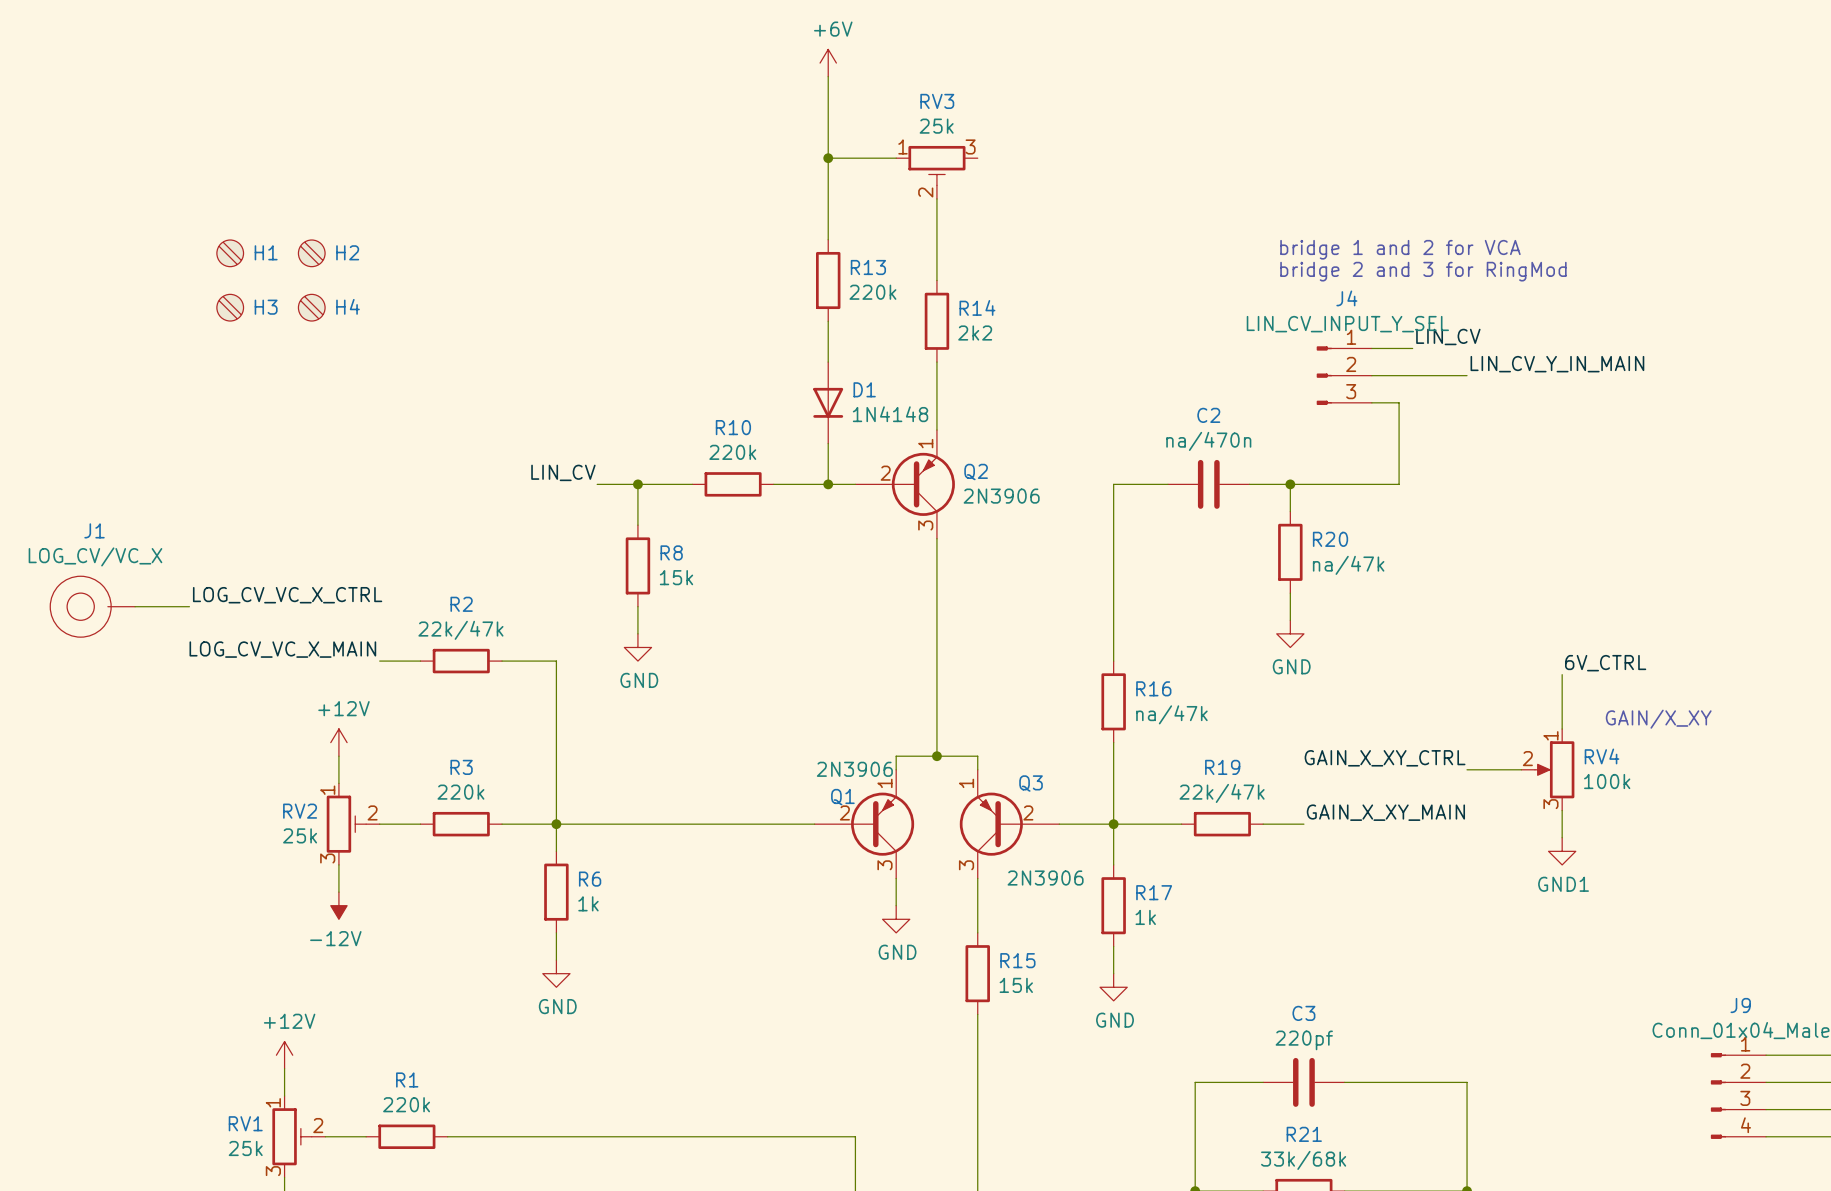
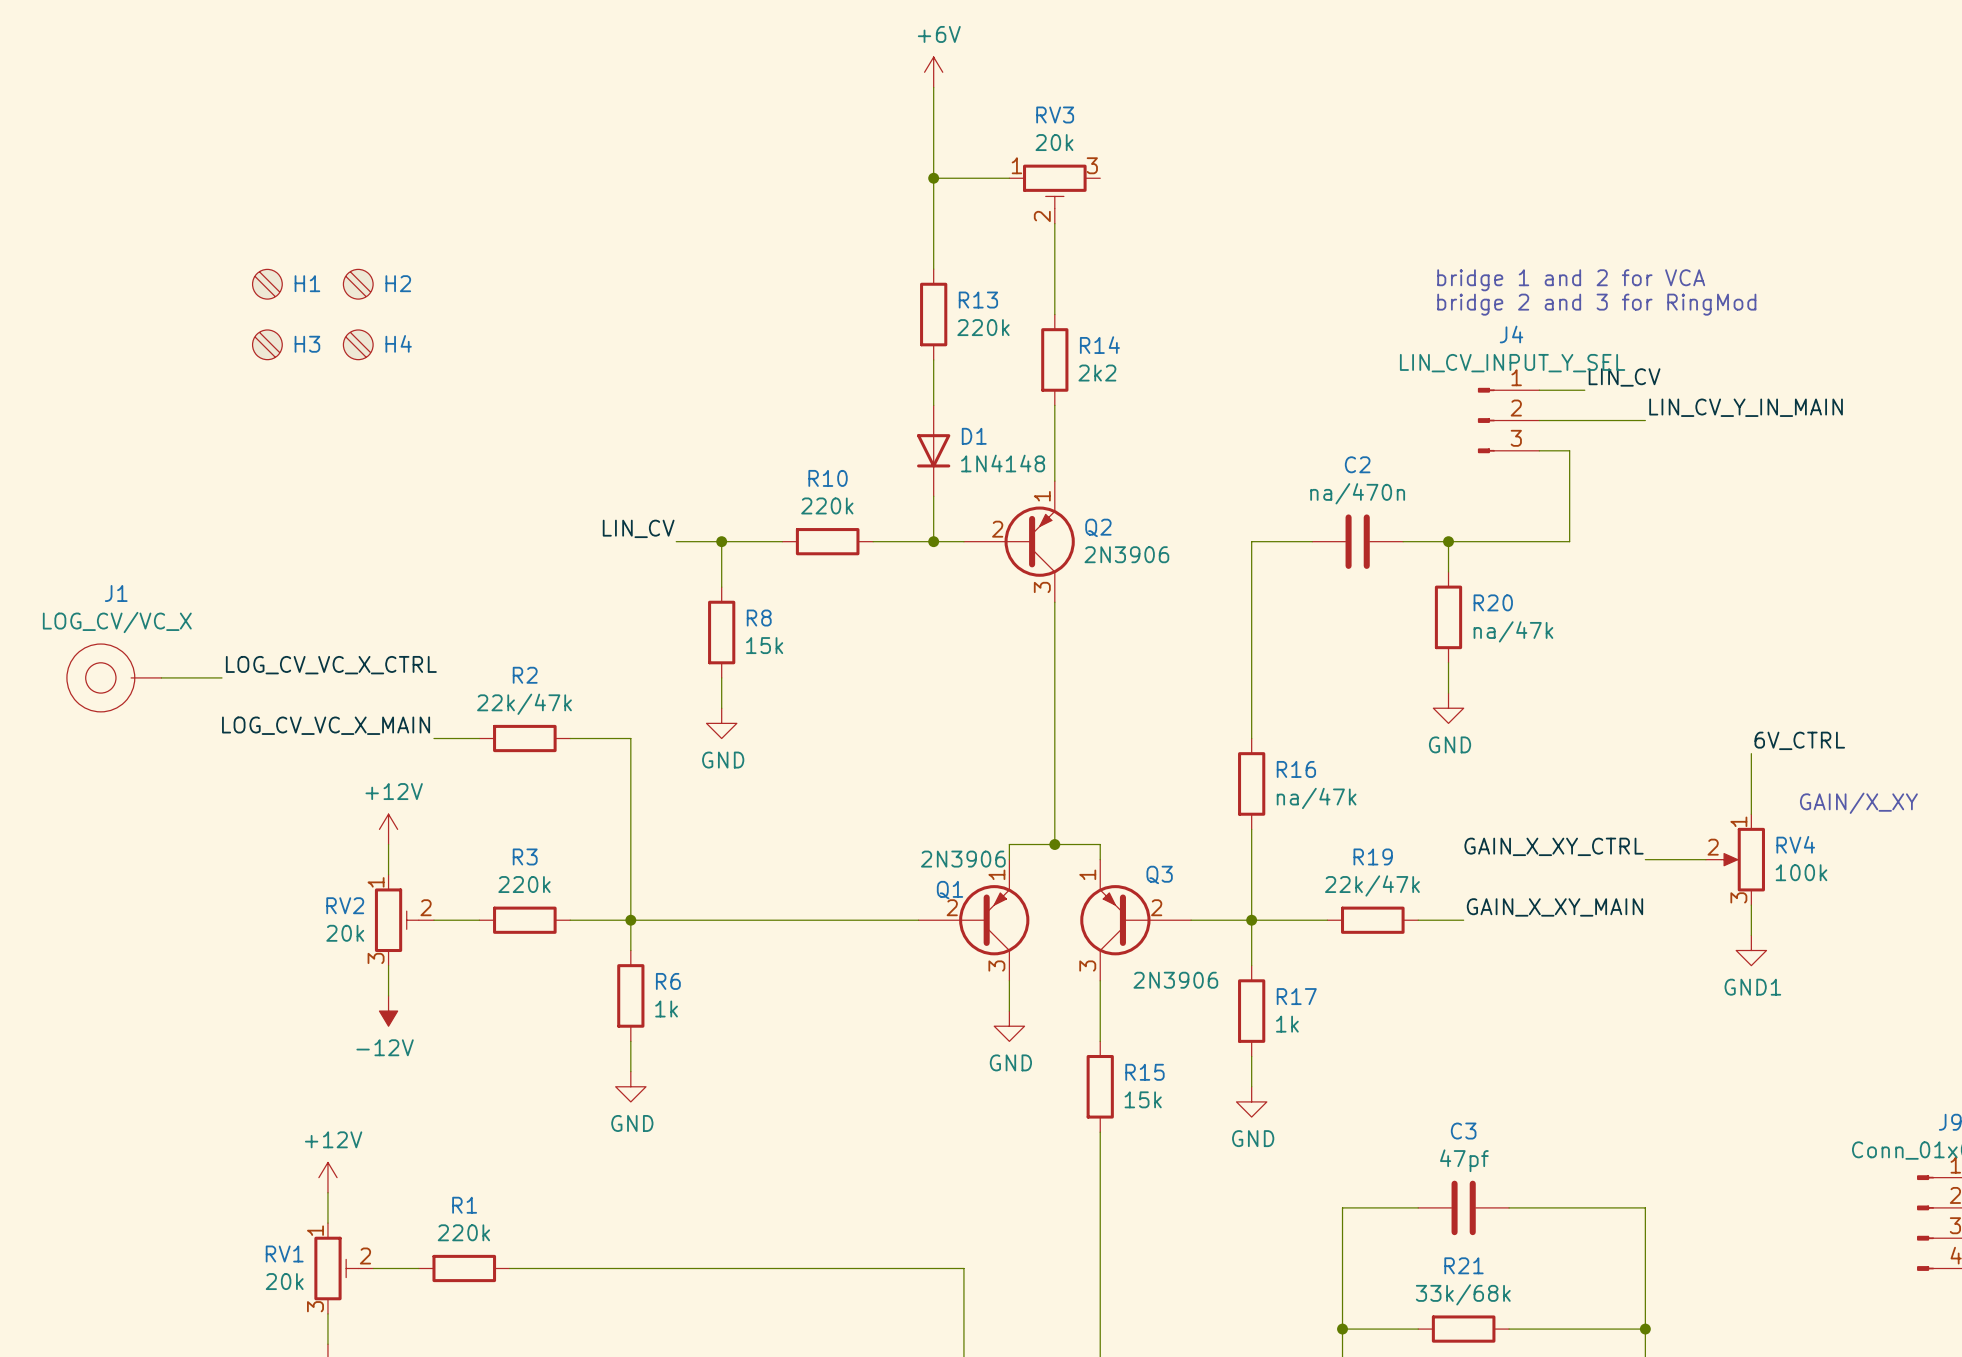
RV3 value: 25k (936, 126) -> 20k (1054, 142)
RV2 value: 25k (300, 835) -> 20k (345, 933)
C3 value: 220pf (1304, 1040) -> 47pf (1464, 1160)
RV1 value: 25k (245, 1148) -> 20k (284, 1281)

